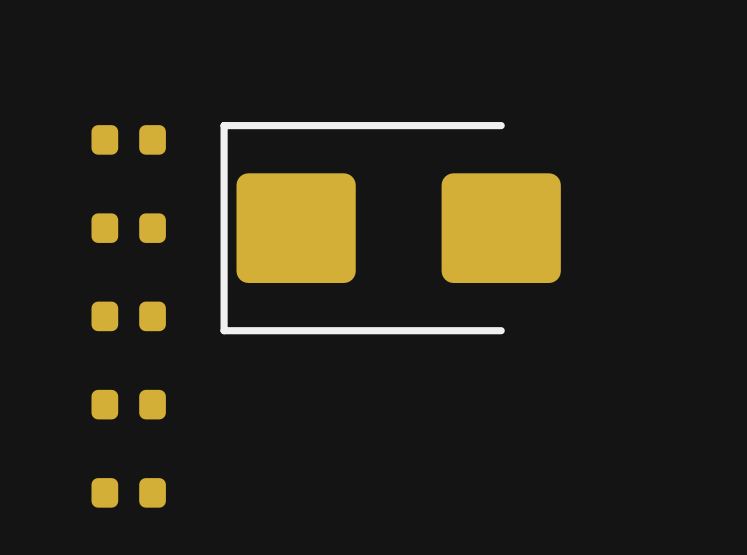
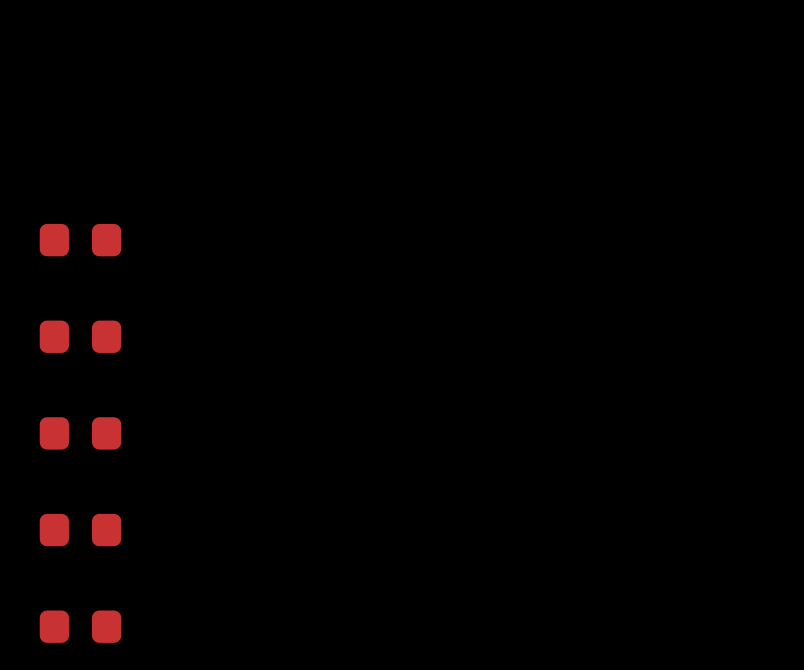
part: (390, 228) -> none

